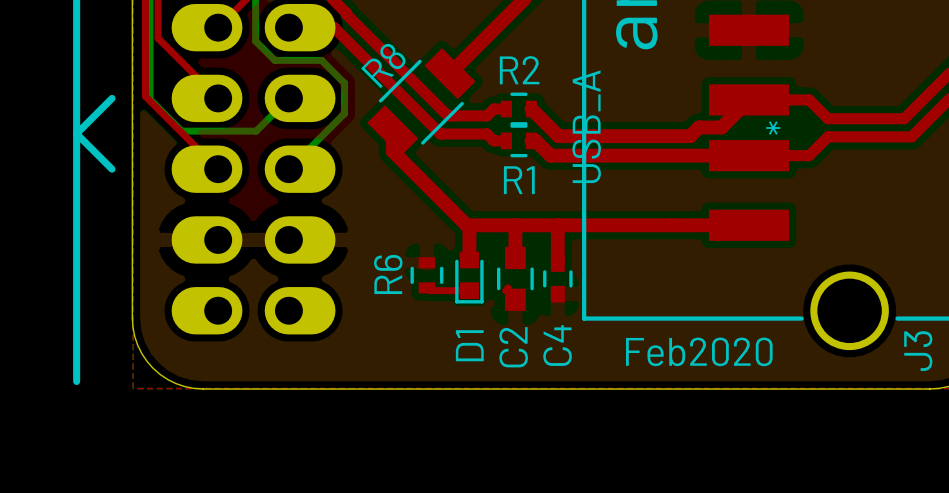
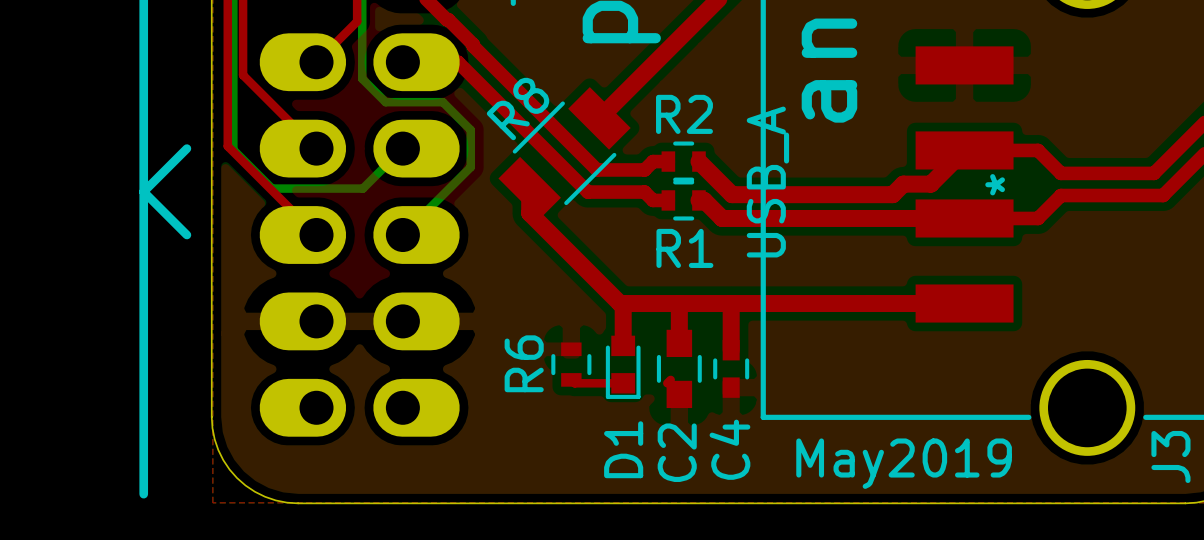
text: Feb2020 (699, 351) -> May2019 (904, 463)

